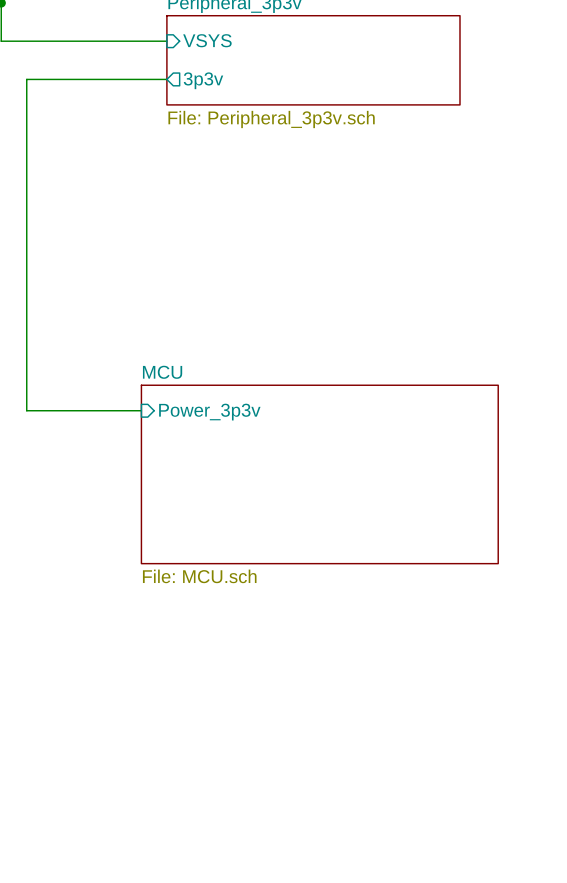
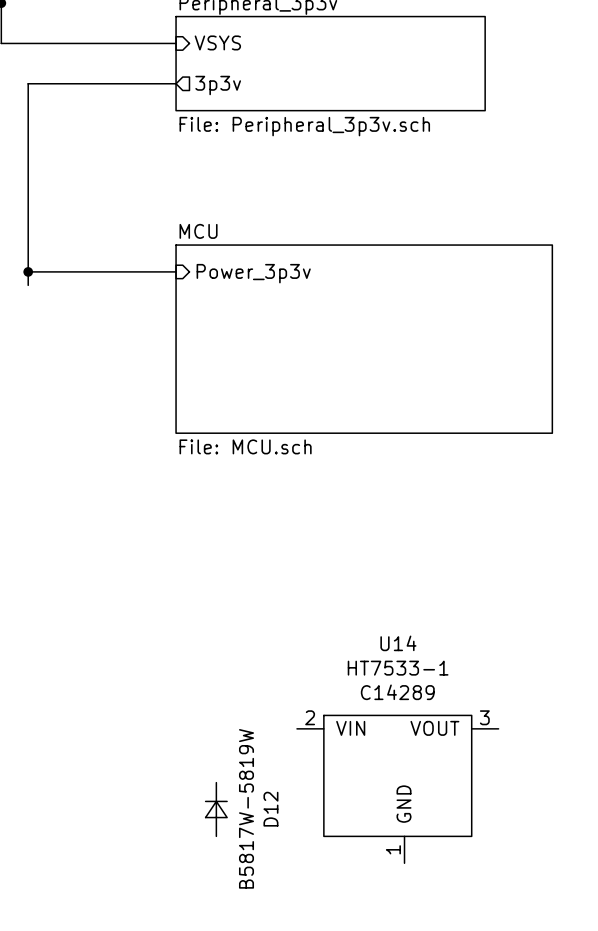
wire: none -> (28, 271) (176, 271)
junction: none -> (28, 271)
wire: (26, 270) (26, 410) (141, 410) -> none
sheet pin position: Power_3p3v (209, 412) -> Power_3p3v (253, 273)
sheet MCU position: (319, 474) -> (364, 339)
U14: none -> HT7533-1 (397, 789)
D12: none -> B5817W-5819W (216, 809)

